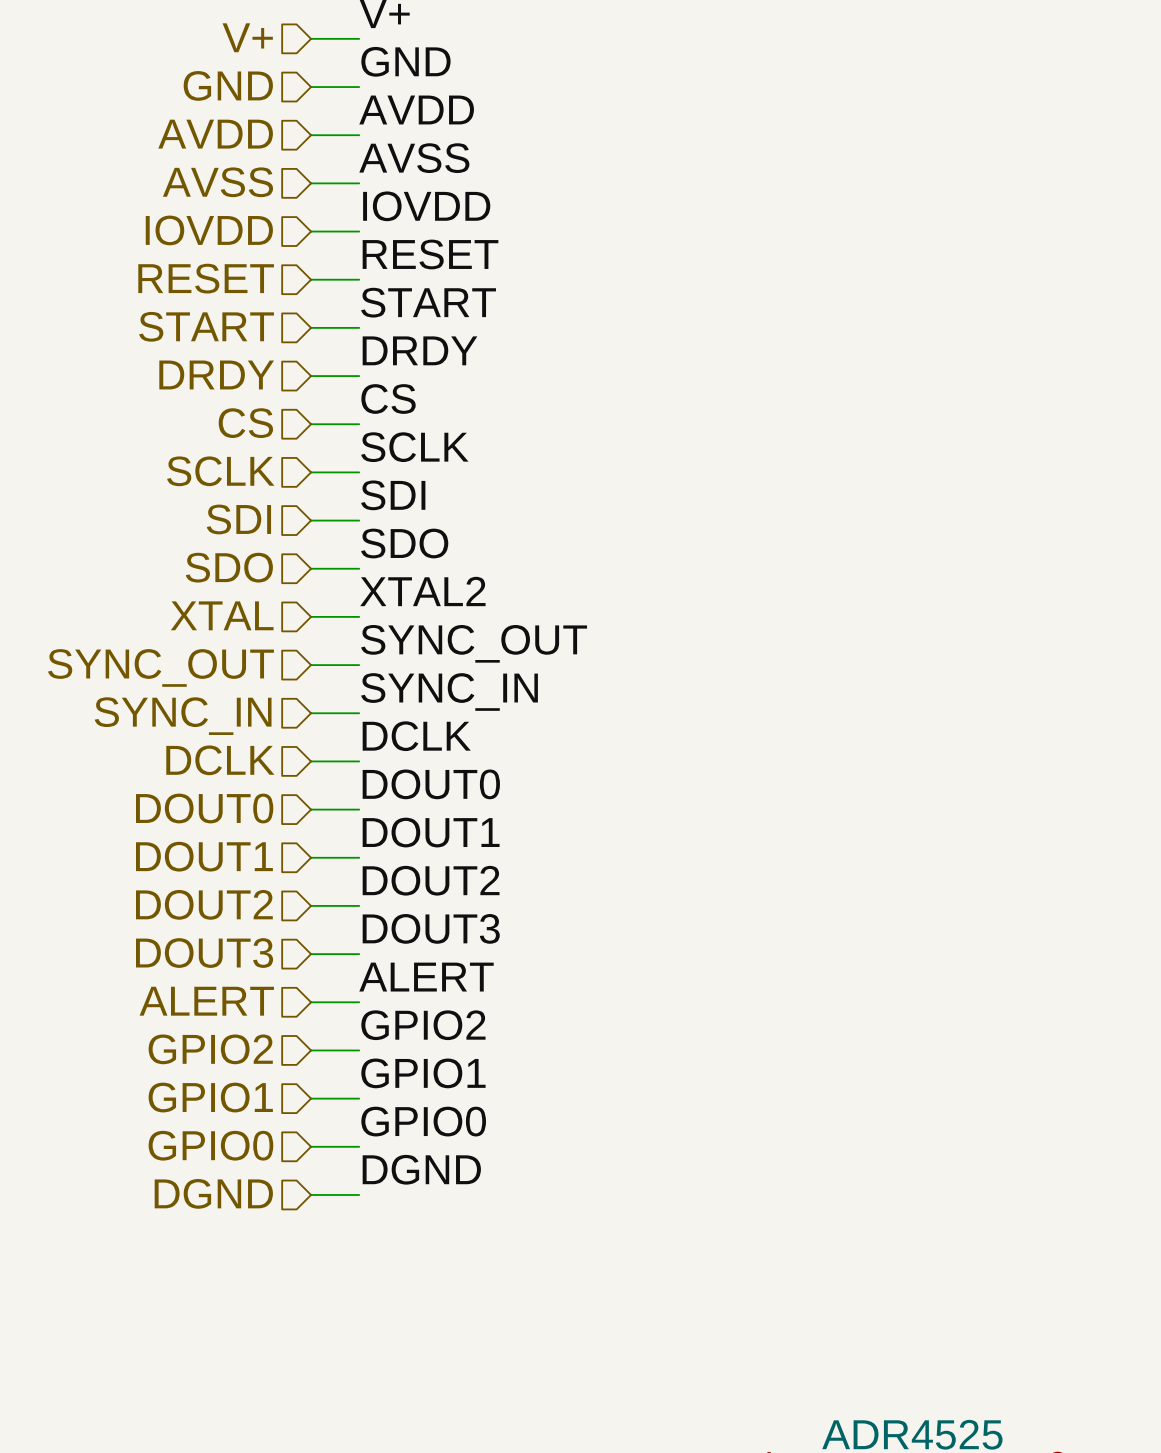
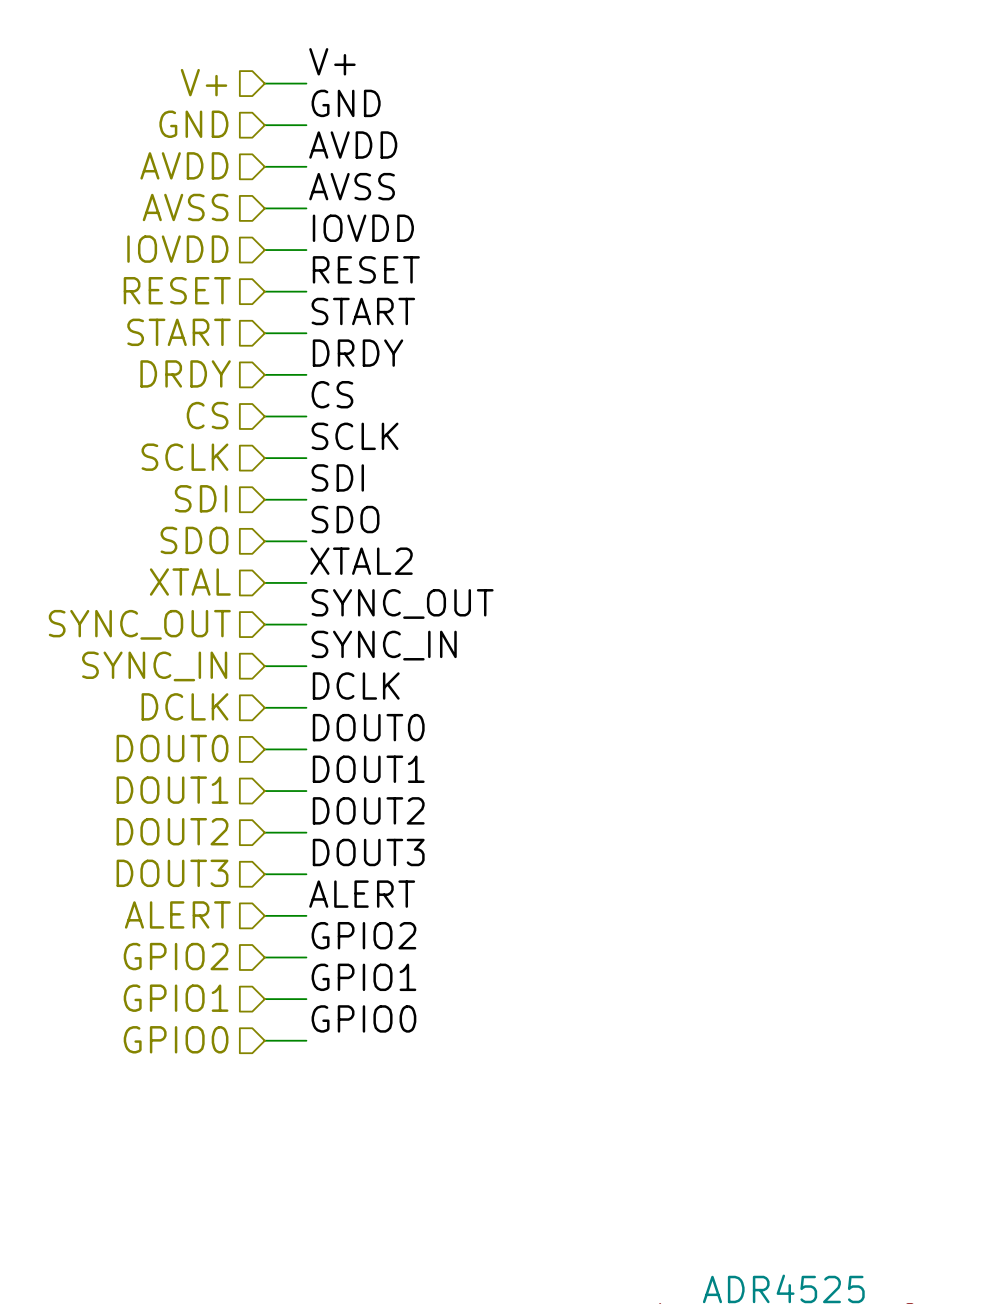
label: DGND (421, 1169) -> none
hierarchical label: DGND (213, 1193) -> none
wire: (311, 1194) (359, 1194) -> none

